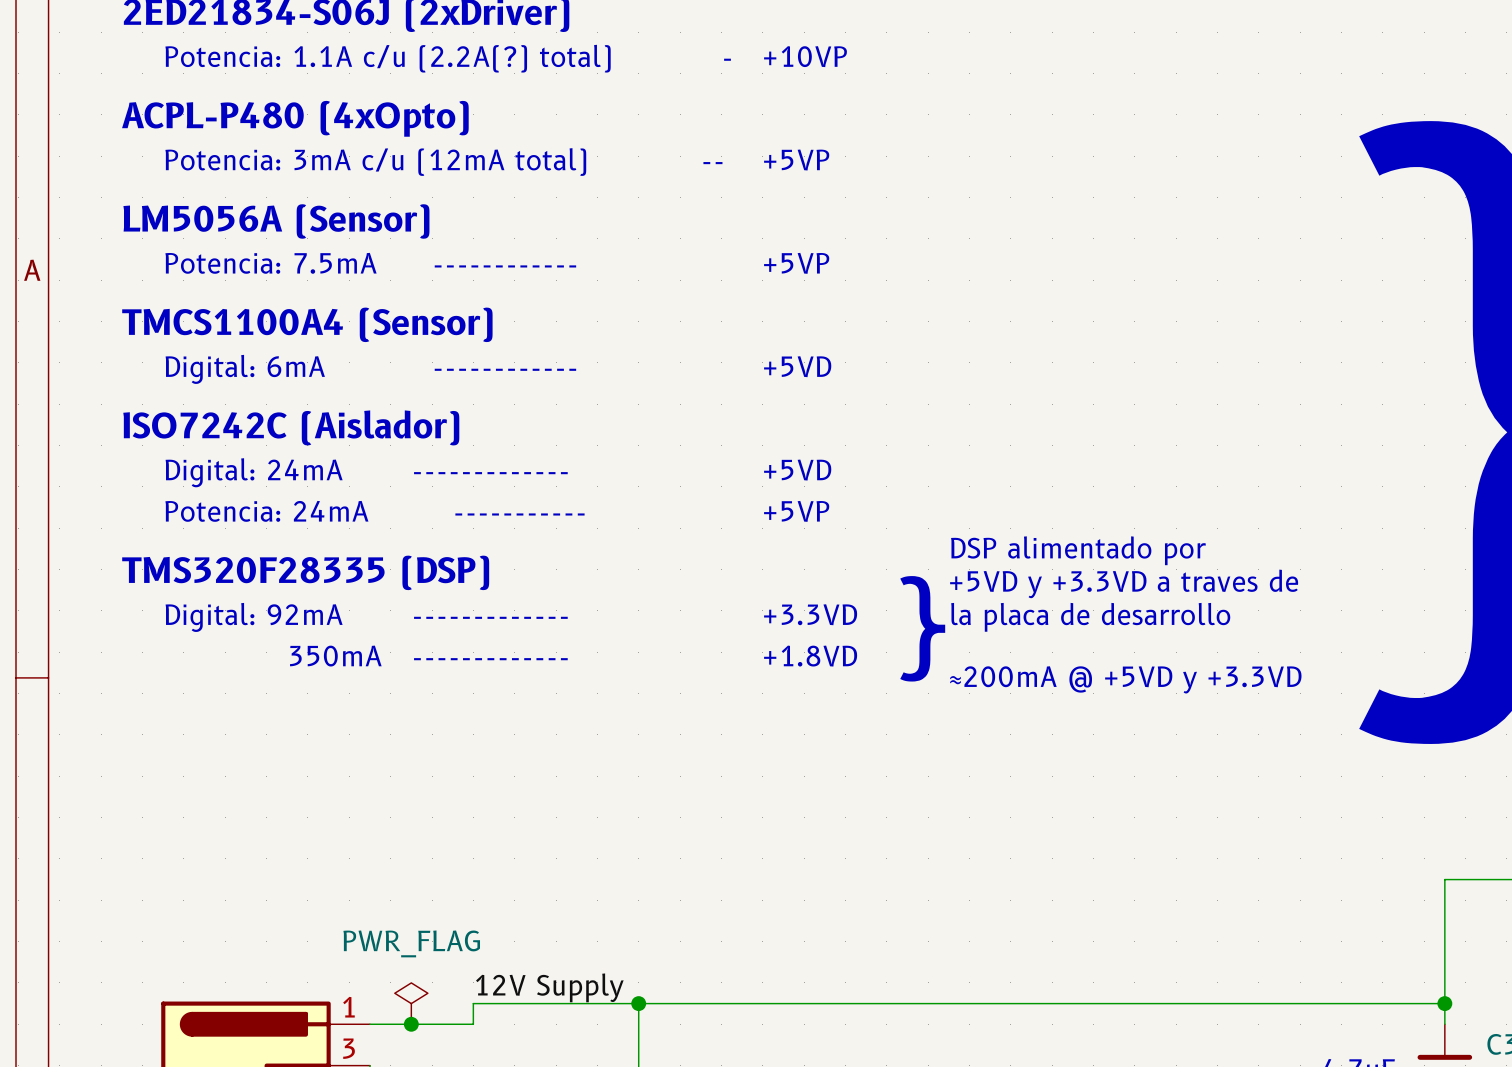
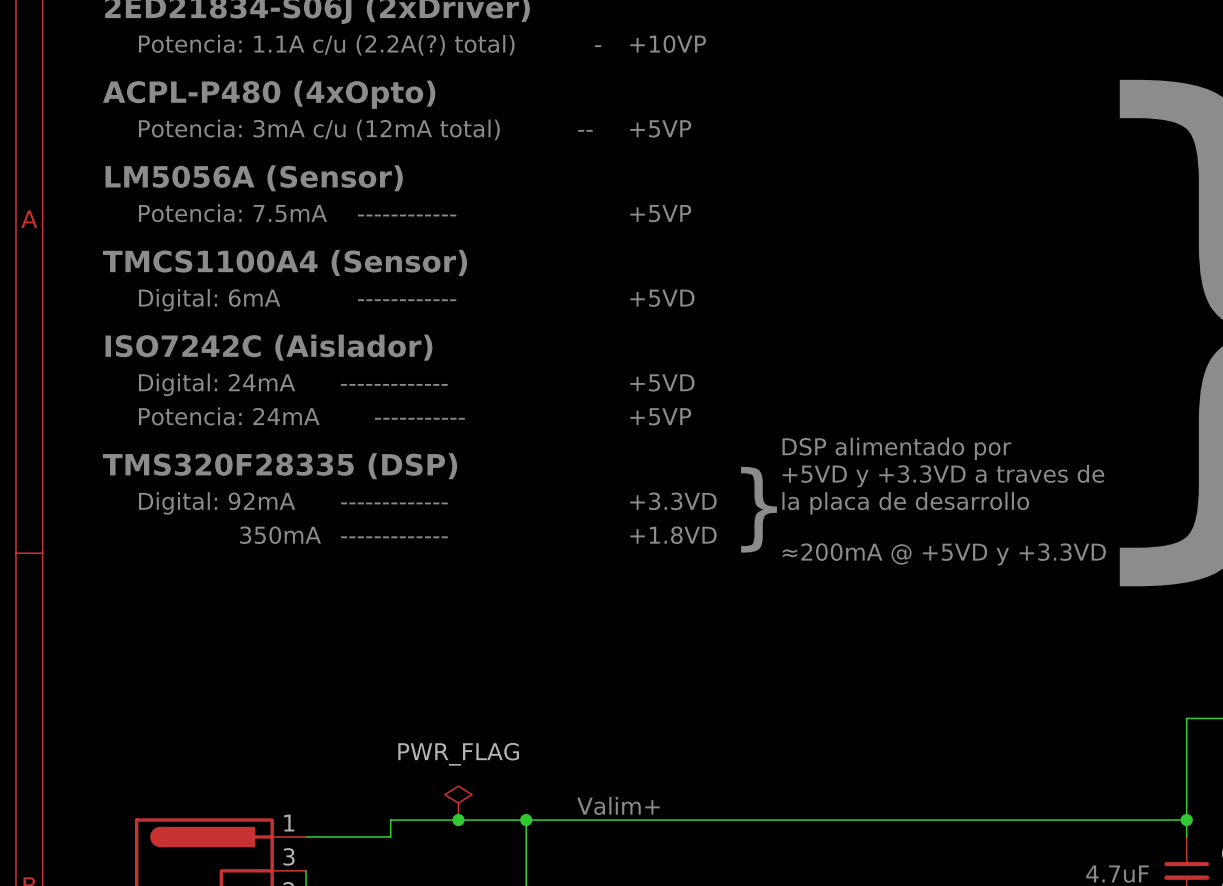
text: none -> Valim+ (618, 805)
label: 12V Supply (549, 987) -> none
power symbol position: PWR_FLAG (411, 1003) -> PWR_FLAG (458, 803)
junction: none -> (458, 820)
junction: (411, 1024) -> none

